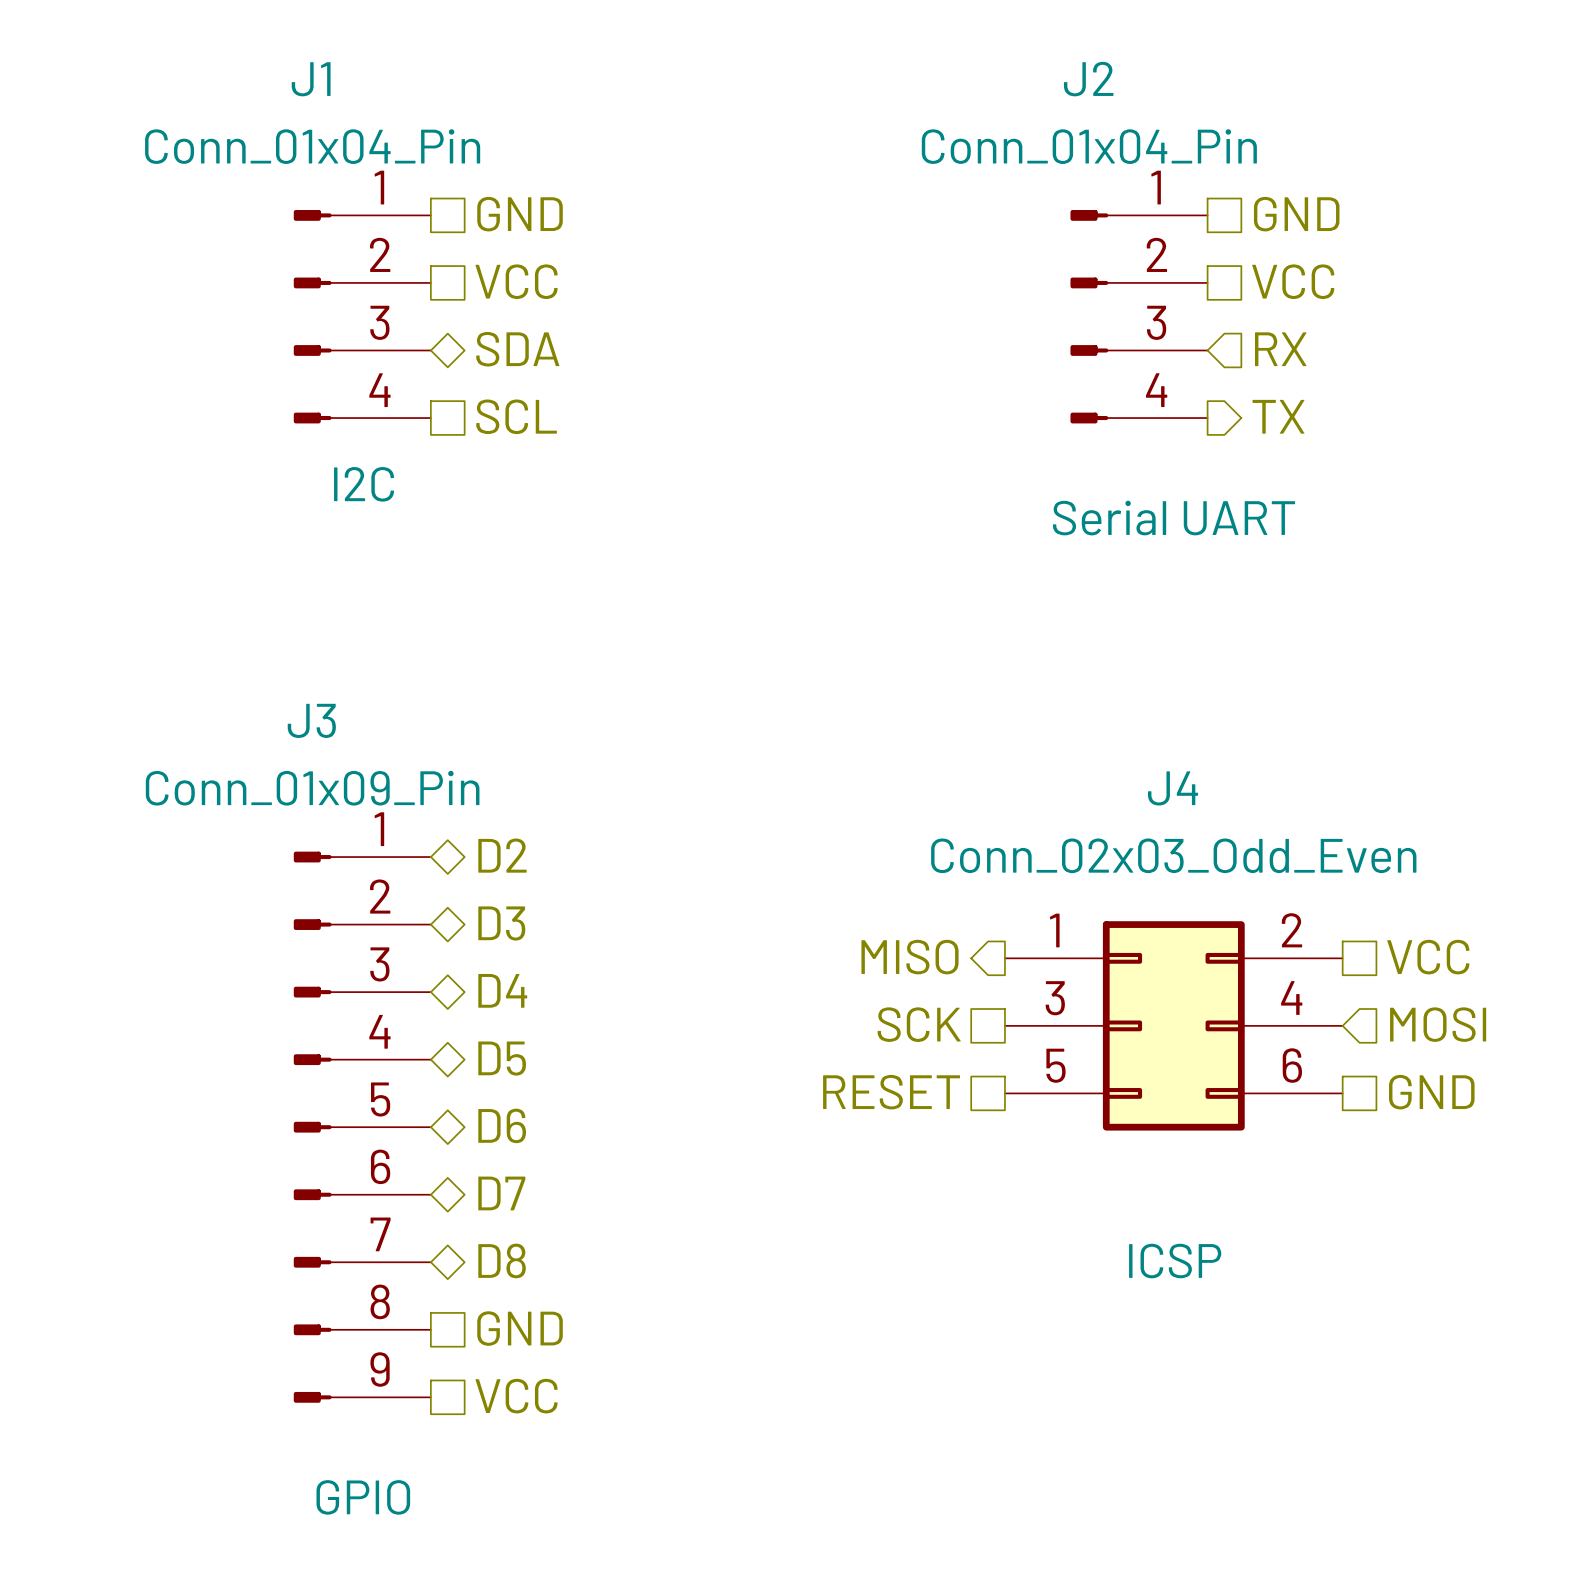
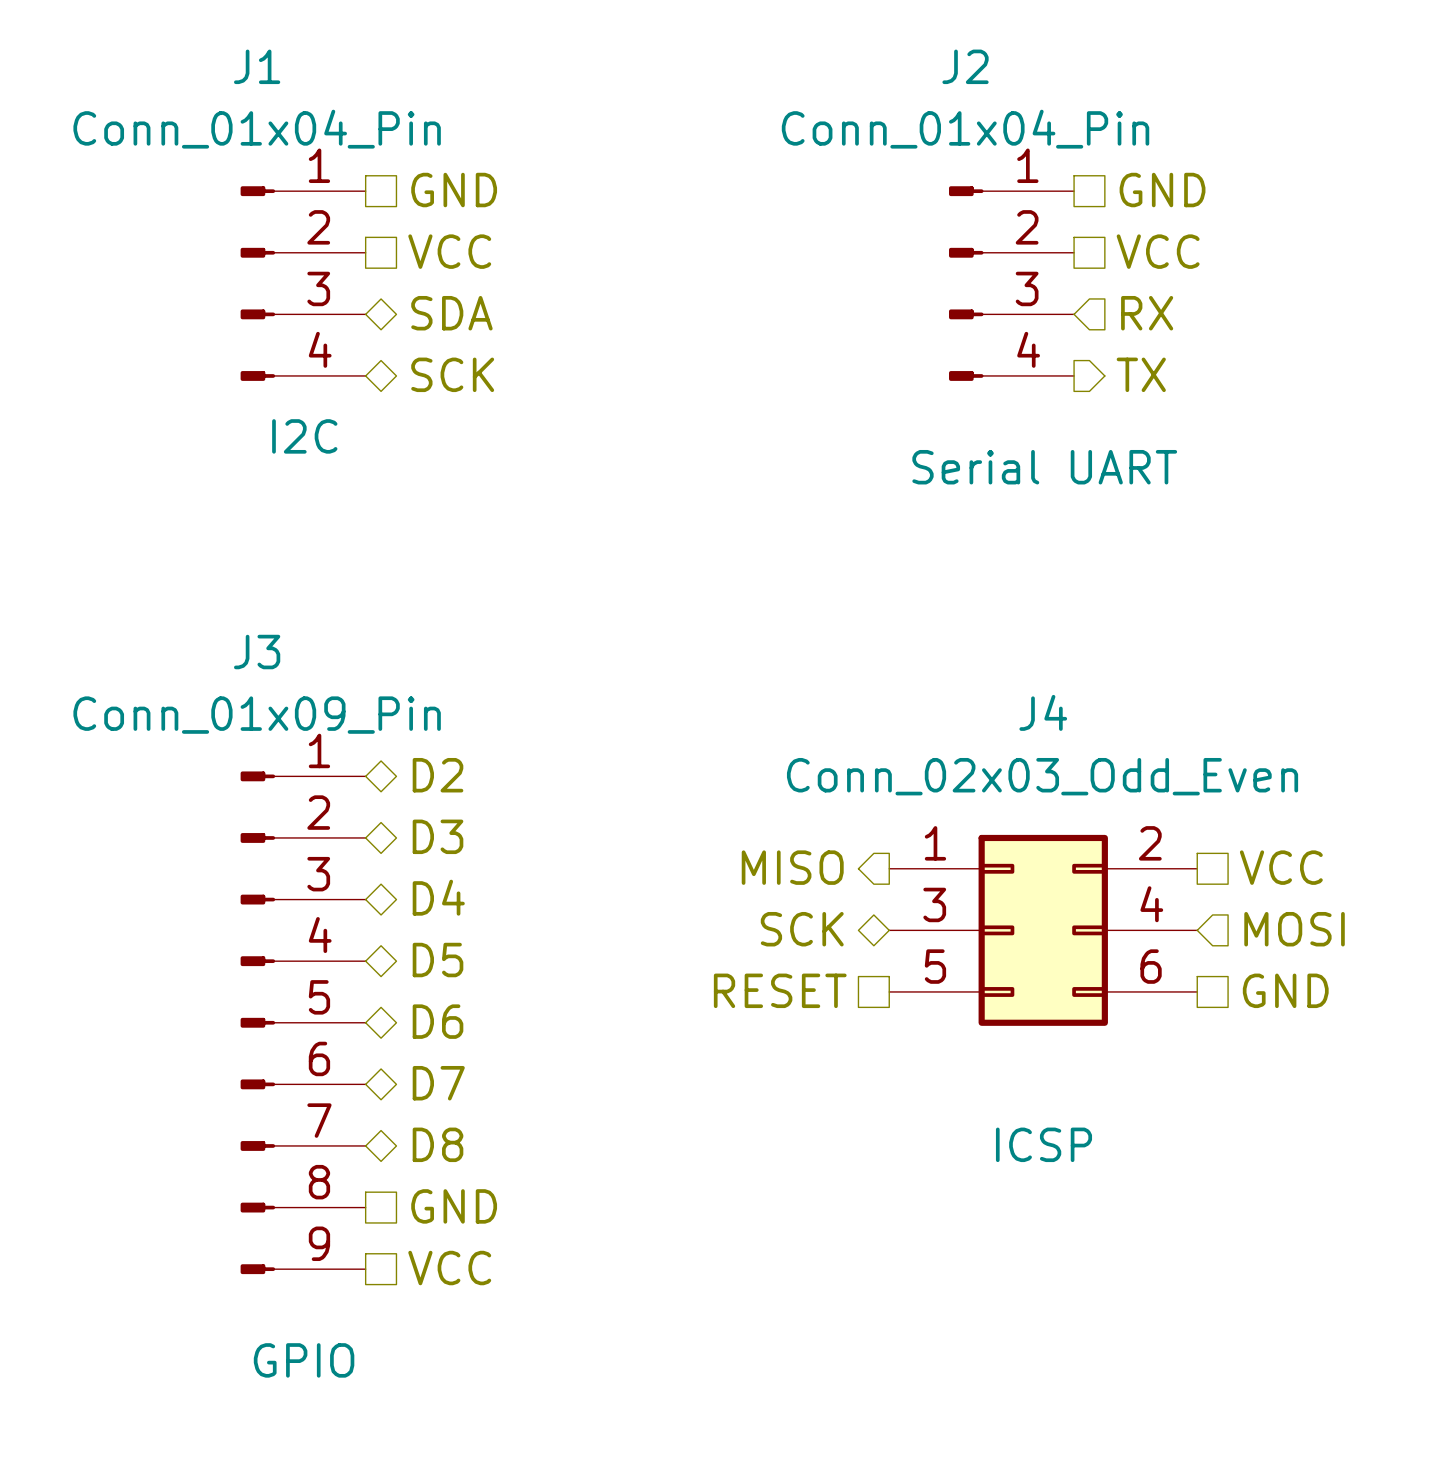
hierarchical label shape: passive (516, 416) -> bidirectional (452, 374)
hierarchical label: SCL (516, 416) -> SCK (452, 374)
hierarchical label shape: passive (919, 1024) -> bidirectional (802, 929)

